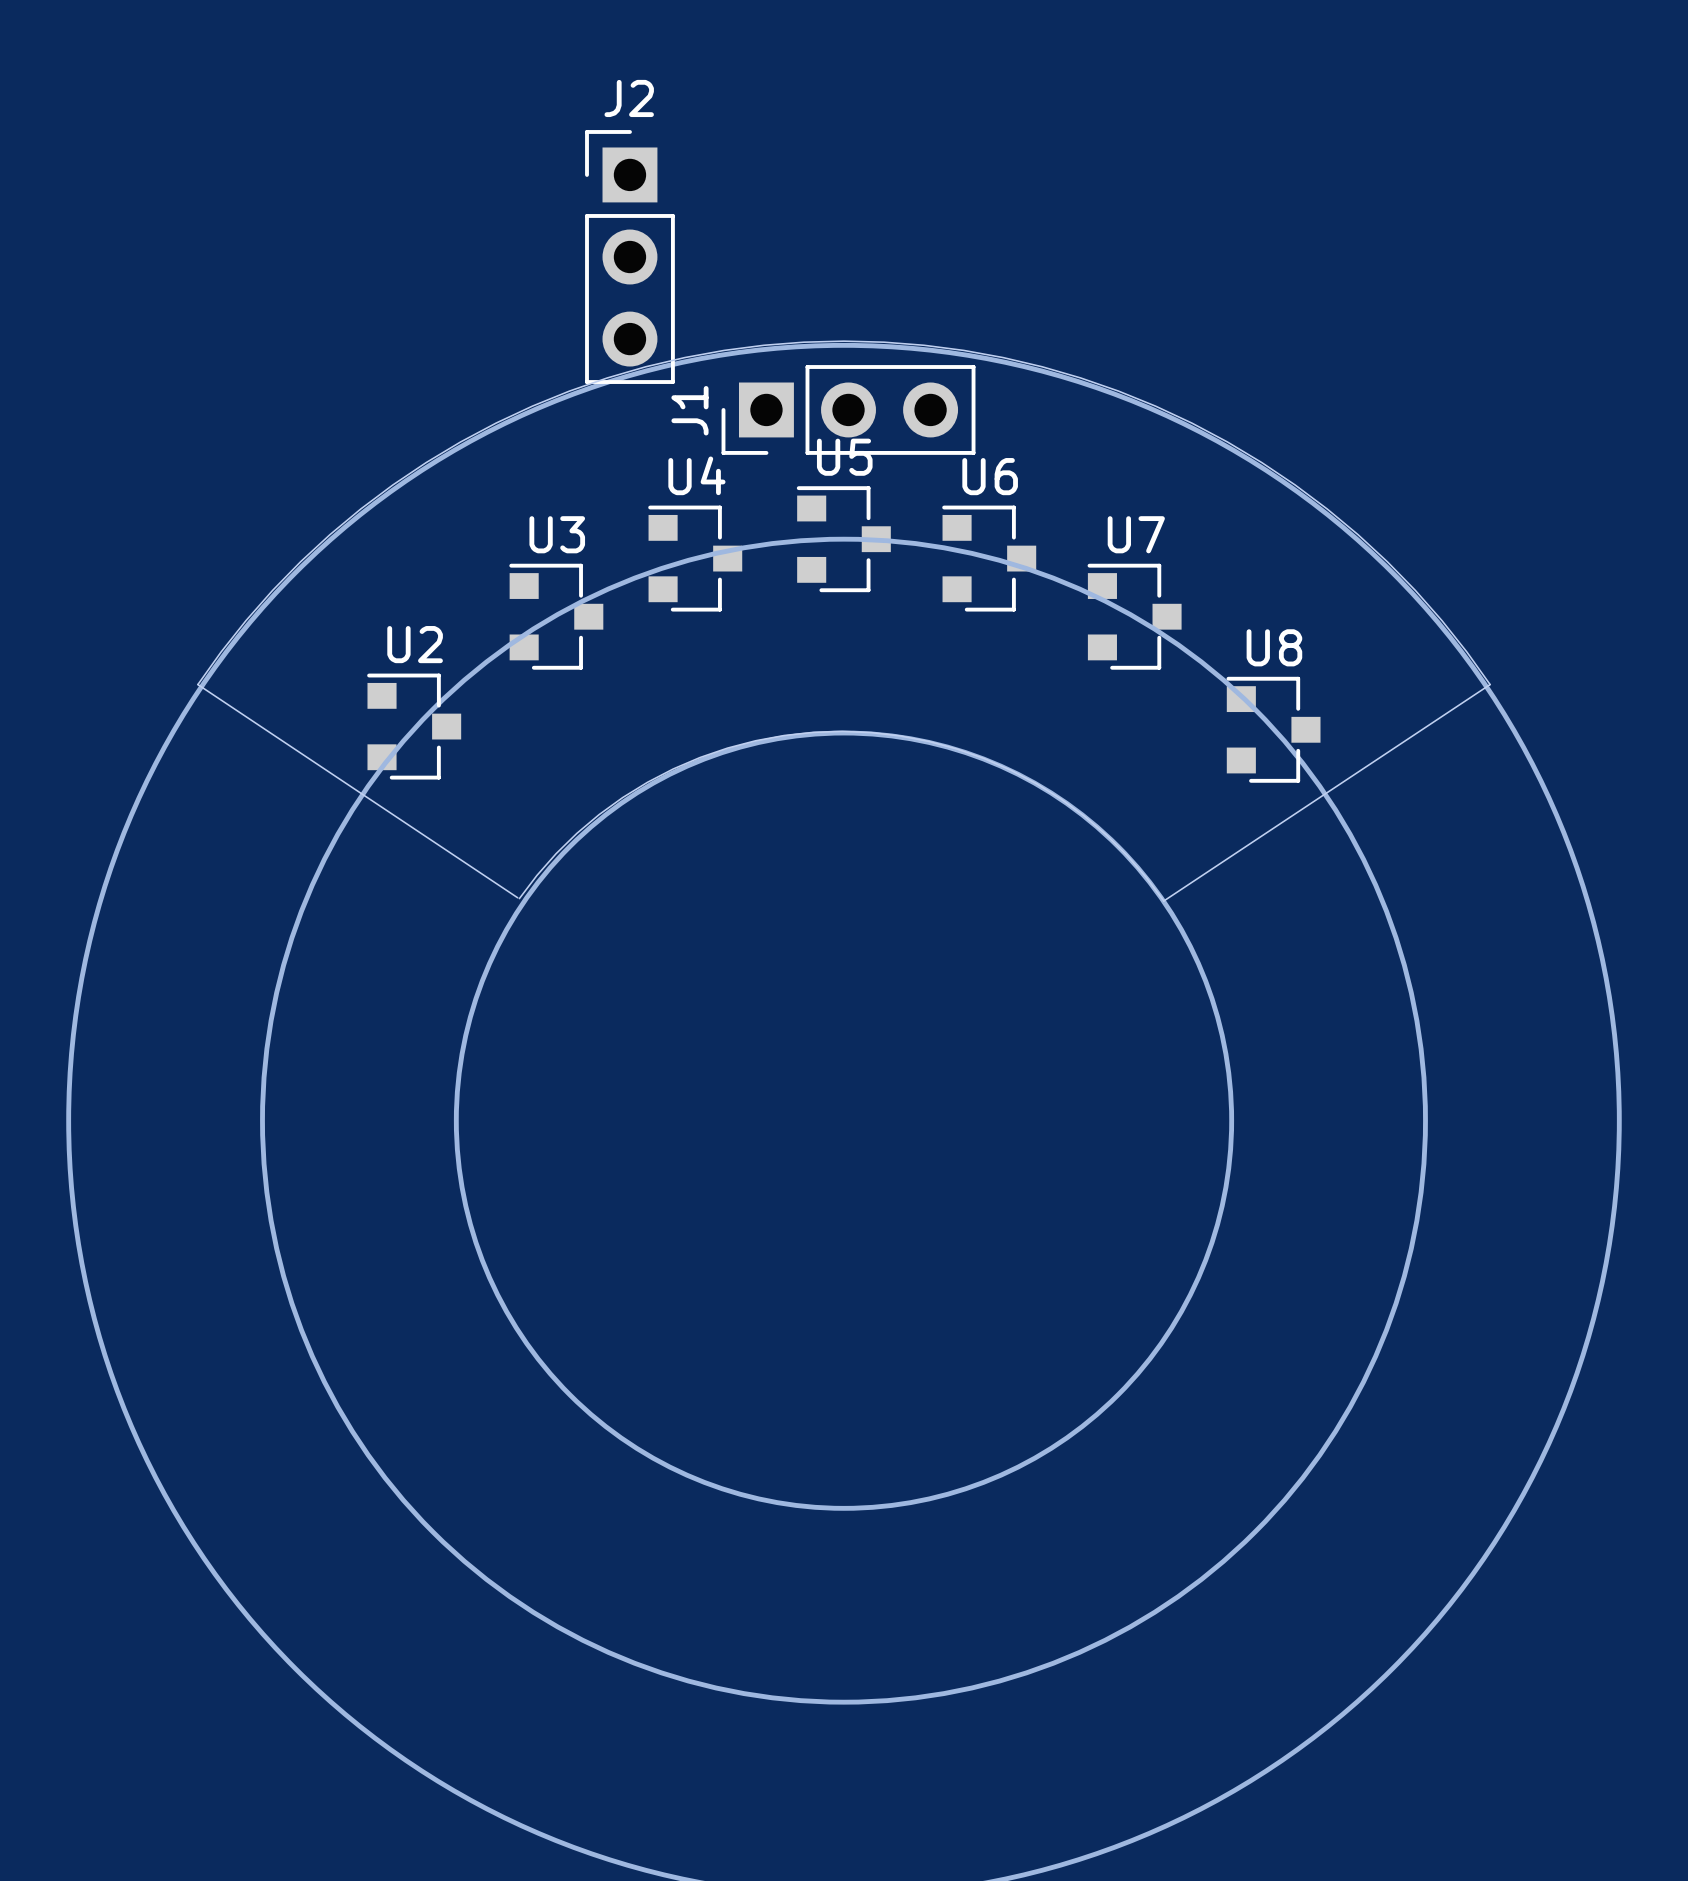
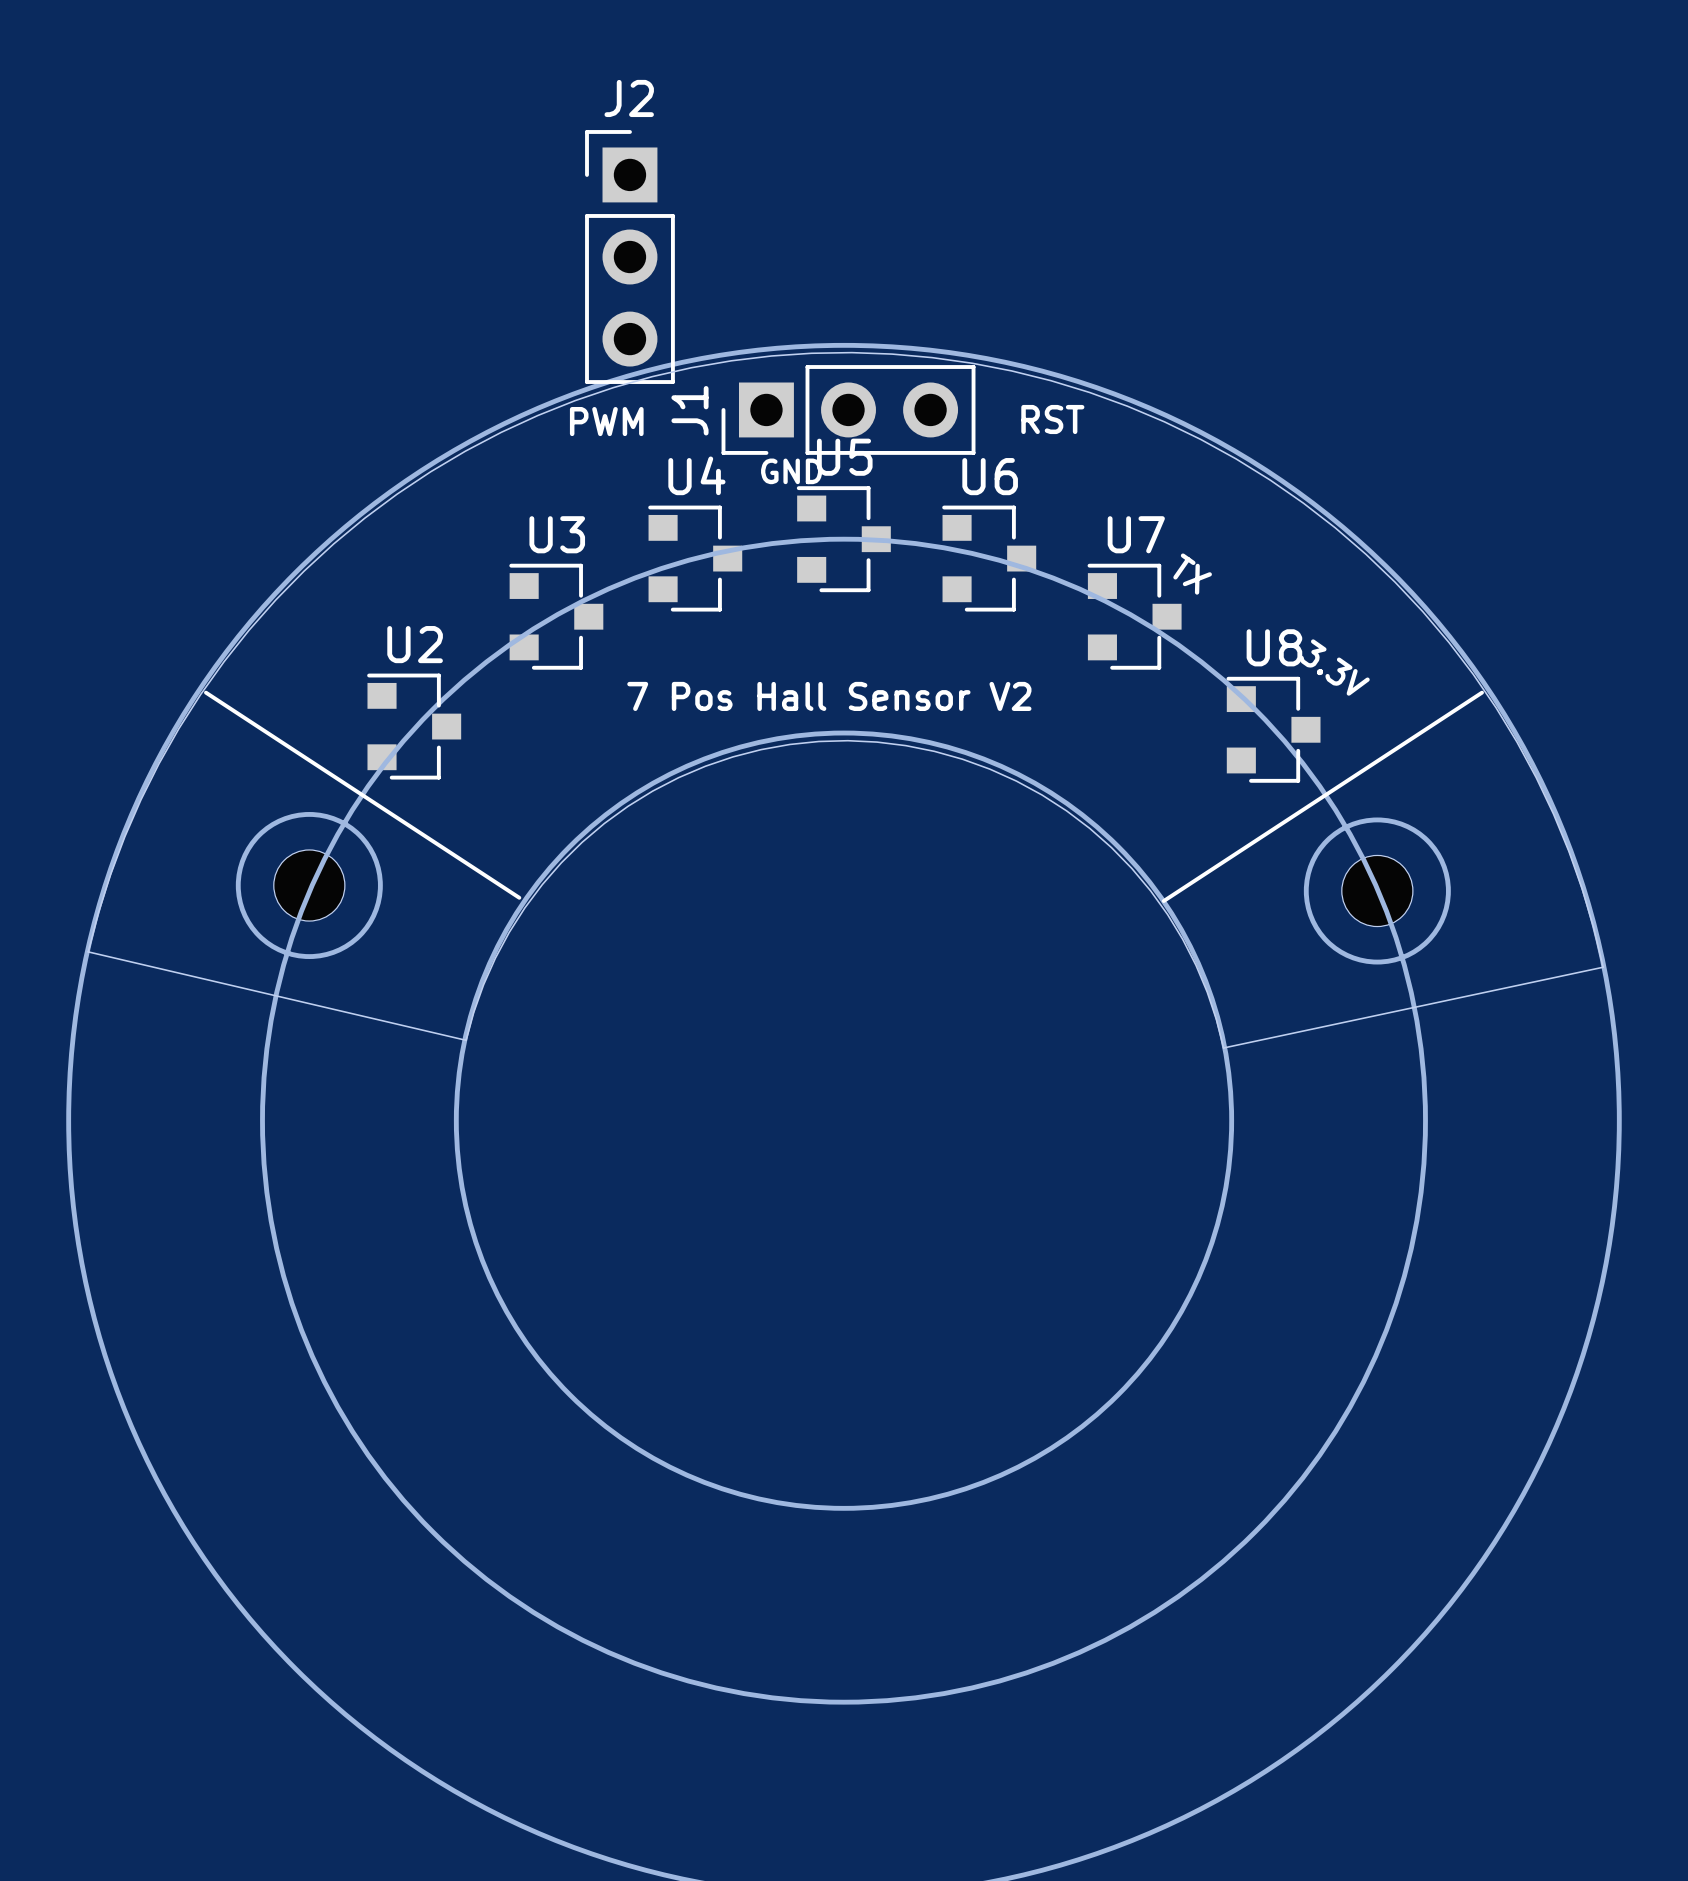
text: none -> RST (1052, 419)
text: none -> PWM (606, 421)
text: none -> GND (791, 471)
text: none -> TX (1192, 574)
text: none -> 3.3V (1334, 667)
line: none -> (205, 692) (519, 897)
line: none -> (1482, 692) (1163, 901)
text: none -> 7 Pos Hall Sensor V2 (829, 696)
part: none -> (309, 885)
part: none -> (1377, 890)
board edge: (517, 897) (197, 684) (221, 651) (272, 590) (330, 534) (392, 484) (460, 441) (532, 406) (607, 377) (684, 357) (724, 350) (803, 342) (884, 342) (963, 350) (1003, 357) (1042, 366) (1118, 391) (1155, 406) (1227, 441) (1261, 462) (1327, 508) (1357, 534) (1415, 590) (1441, 620) (1490, 684) (1163, 901) (1127, 855) (1084, 816) (1061, 799) (1010, 770) (956, 748) (928, 741) (900, 735) (842, 731) (784, 735) (755, 740) (727, 748) (673, 768) (622, 797) (576, 833) (536, 875) (519, 898) -> none
board edge: none -> (88, 951) (466, 1040) (483, 984) (509, 932) (542, 884) (582, 842) (604, 823) (652, 791) (705, 766) (761, 749) (818, 741) (847, 740) (905, 745) (934, 751) (989, 769) (1042, 795) (1089, 828) (1131, 868) (1167, 914) (1195, 965) (1207, 992) (1223, 1048) (1603, 967) (1593, 928) (1568, 851) (1536, 777) (1496, 707) (1448, 642) (1422, 611) (1365, 554) (1335, 528) (1303, 503) (1236, 458) (1164, 421) (1127, 406) (1050, 380) (1011, 370) (932, 357) (851, 352) (771, 356) (691, 367) (613, 387) (575, 400) (501, 432) (465, 451) (430, 471) (364, 518) (304, 571) (275, 599) (224, 661) (178, 728) (159, 763) (124, 836) (110, 874) (88, 951)

